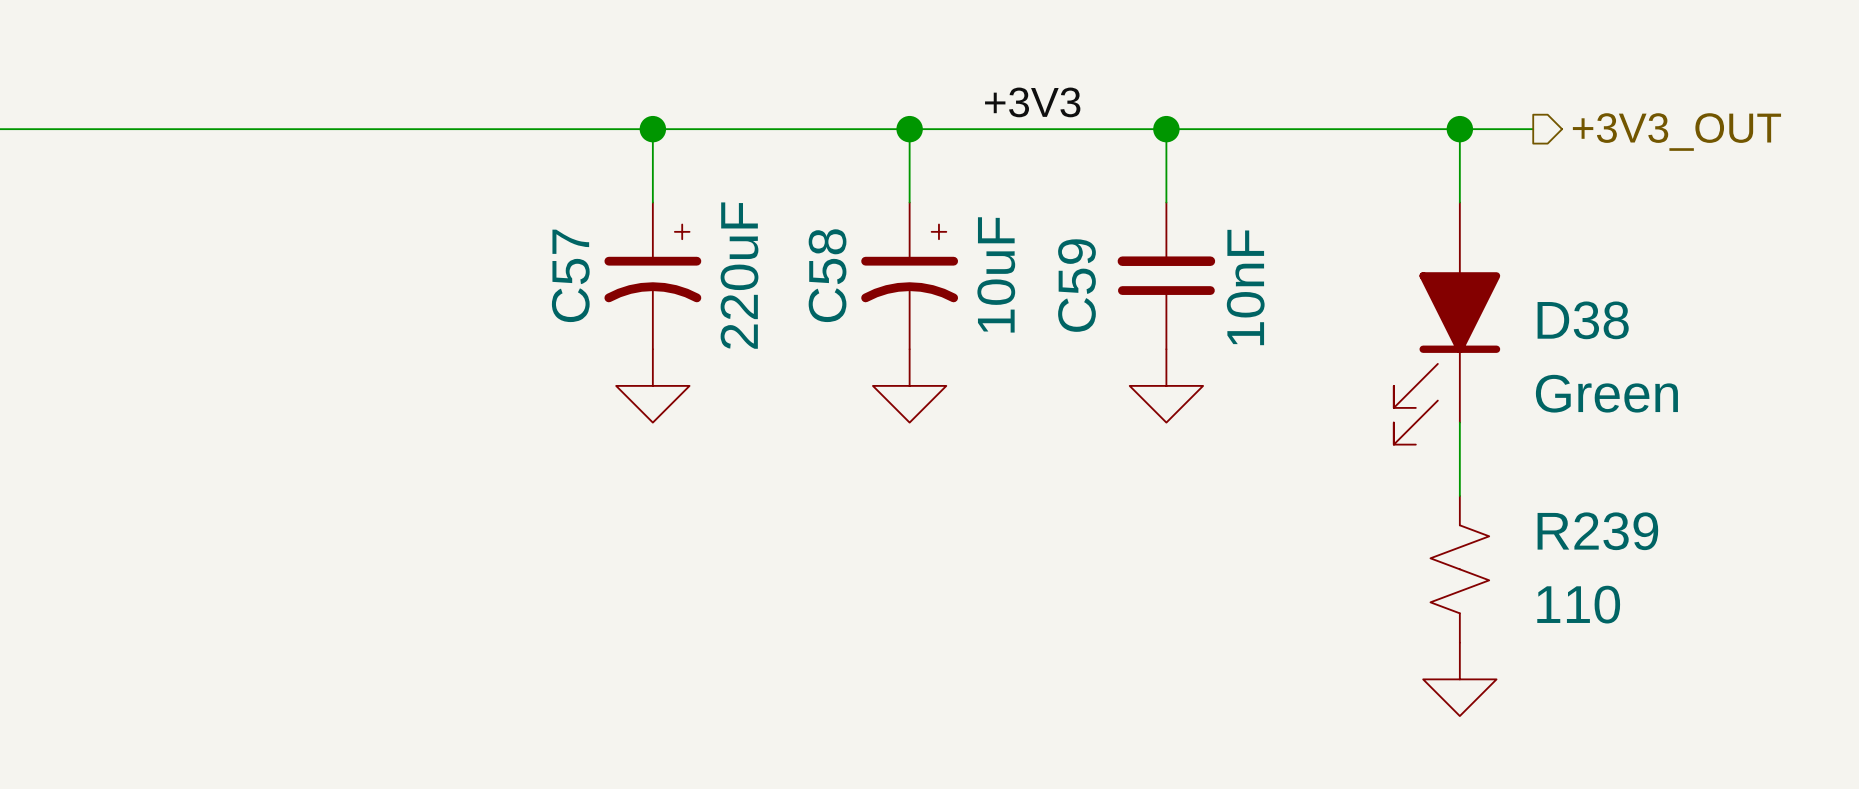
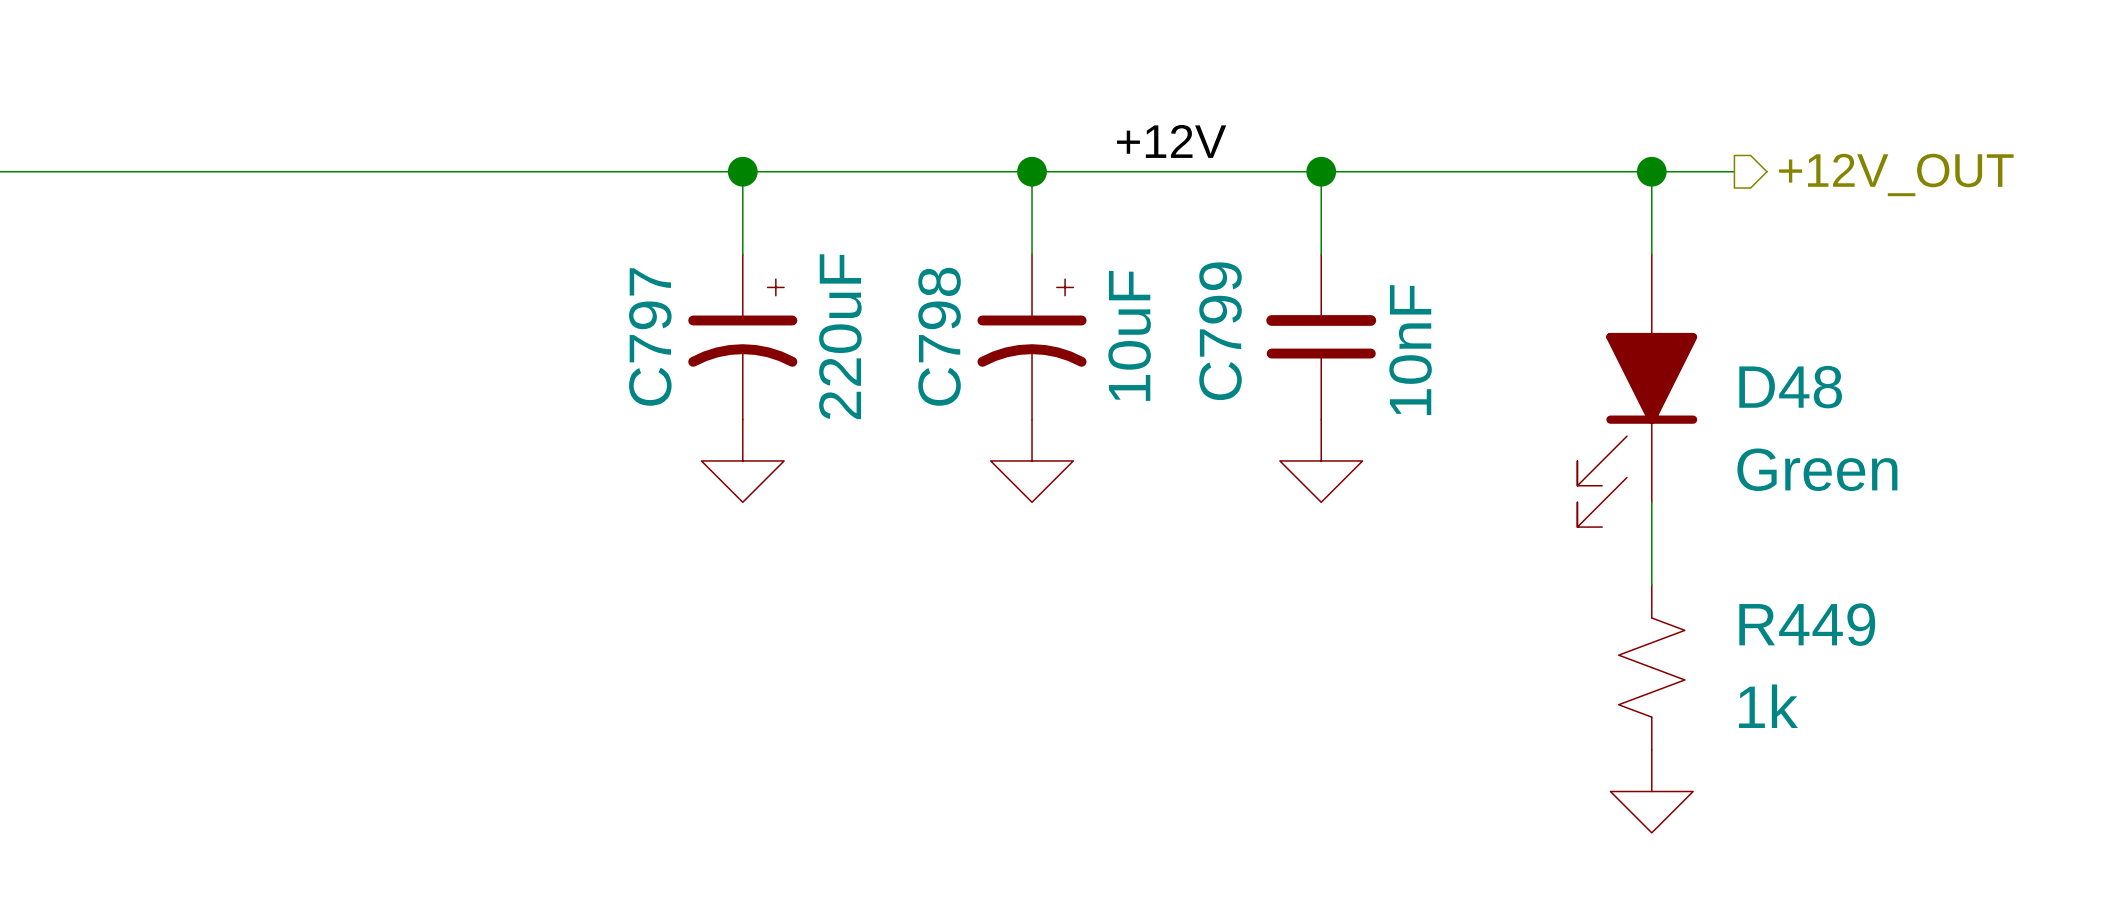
label: +3V3 (1032, 102) -> +12V (1171, 141)
hierarchical label: +3V3_OUT (1676, 132) -> +12V_OUT (1896, 174)
C57 name: C57 (570, 275) -> C797 (650, 336)
C58 name: C58 (827, 275) -> C798 (939, 336)
C59 name: C59 (1076, 285) -> C799 (1220, 331)
D38 name: D38 (1583, 320) -> D48 (1790, 387)
R239 name: R239 (1597, 531) -> R449 (1807, 624)
R239 value: 110 (1578, 604) -> 1k (1768, 706)

